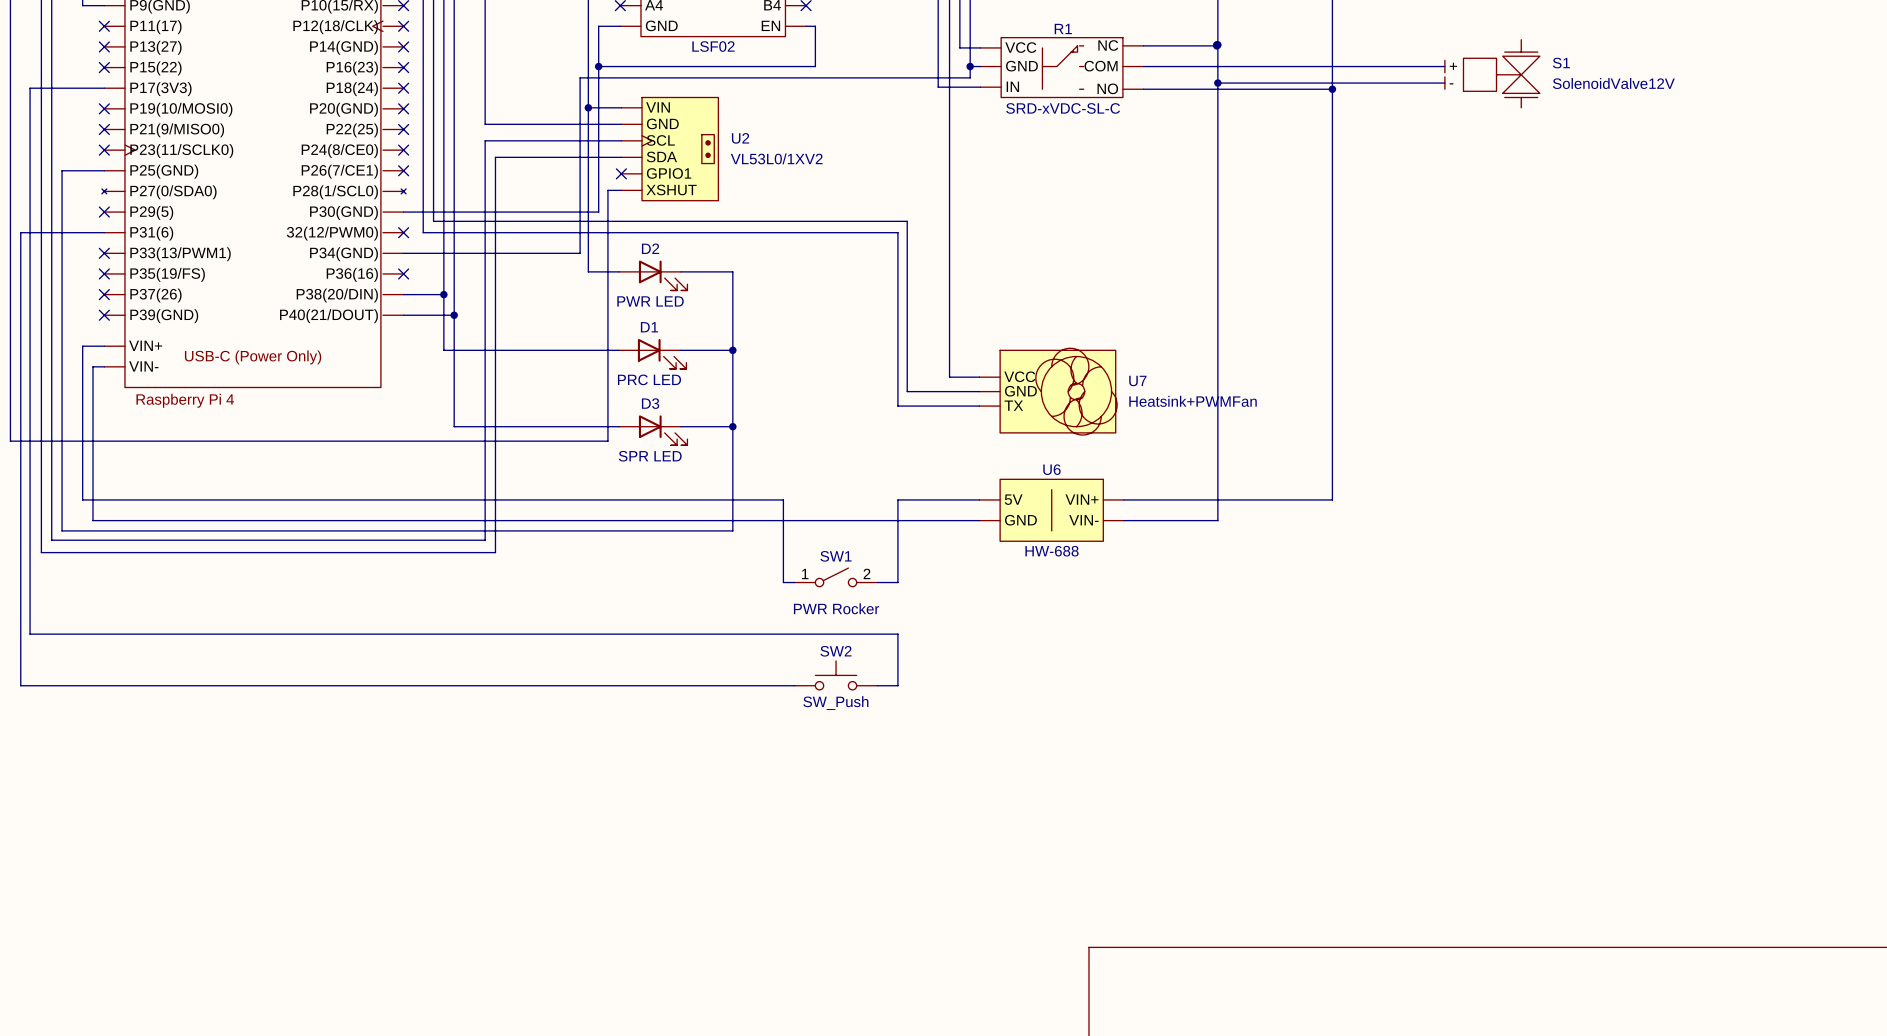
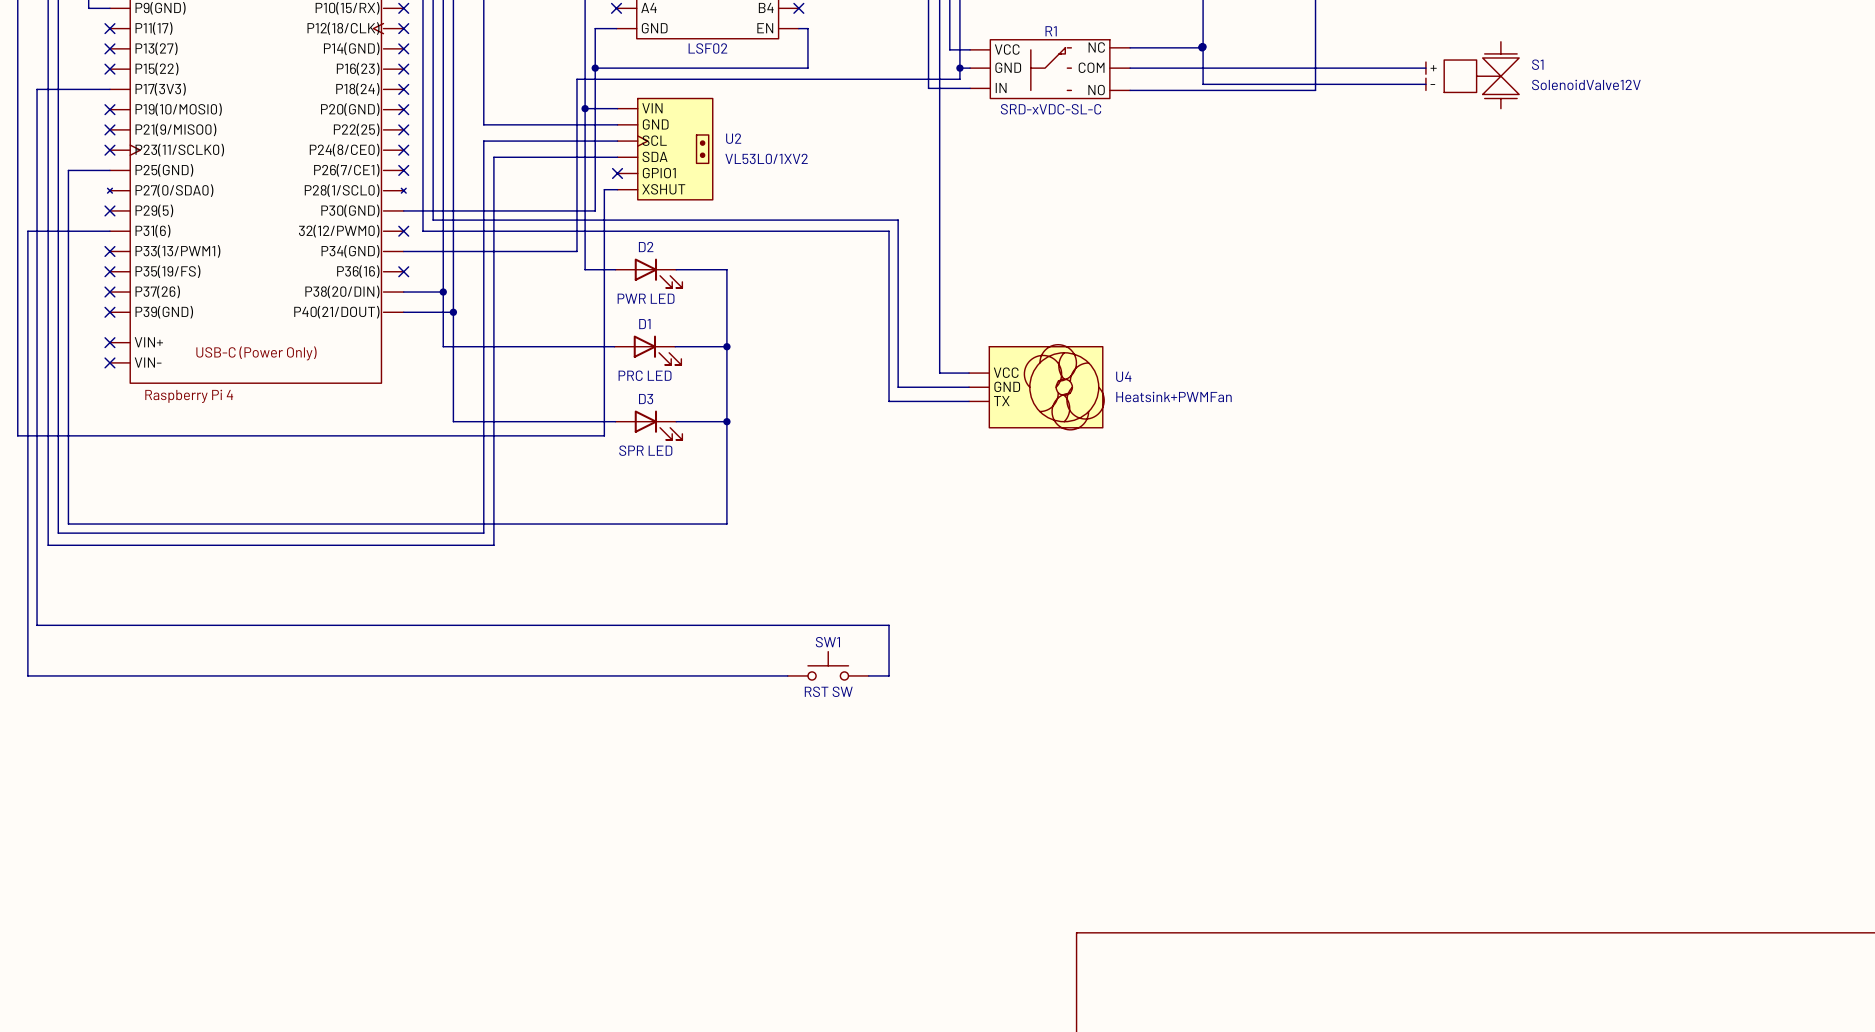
wire: (1217, 83) (1217, 520) (1123, 520) -> none
junction: (1217, 83) -> none
wire: (1332, 89) (1332, 499) (1123, 499) -> none
junction: (1332, 89) -> none
wire: (104, 346) (82, 346) (82, 499) (783, 499) (783, 582) (794, 582) -> none
no-connect mark: none -> (109, 342)
wire: (104, 366) (92, 366) (92, 520) (979, 520) -> none
no-connect mark: none -> (109, 362)
U7 name: U7 (1137, 380) -> U4 (1123, 376)
wire: (979, 499) (897, 499) (897, 582) (877, 582) -> none
U6: HW-688 (1051, 510) -> none
SW1: PWR Rocker (836, 577) -> none
SW2 name: SW2 (835, 651) -> SW1 (827, 642)
SW2 value: SW_Push (835, 703) -> RST SW (828, 691)

